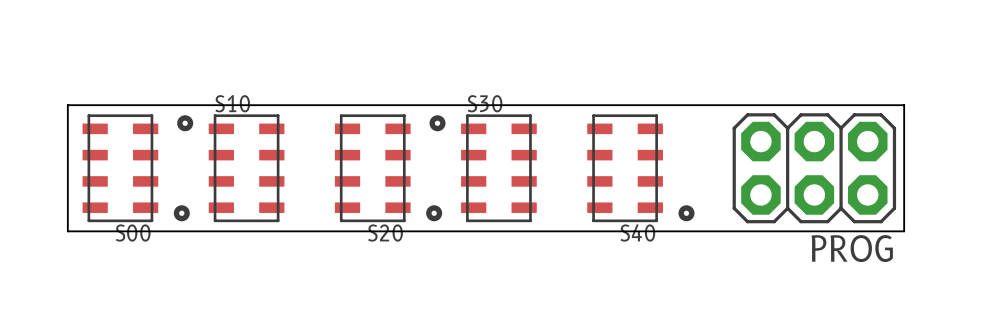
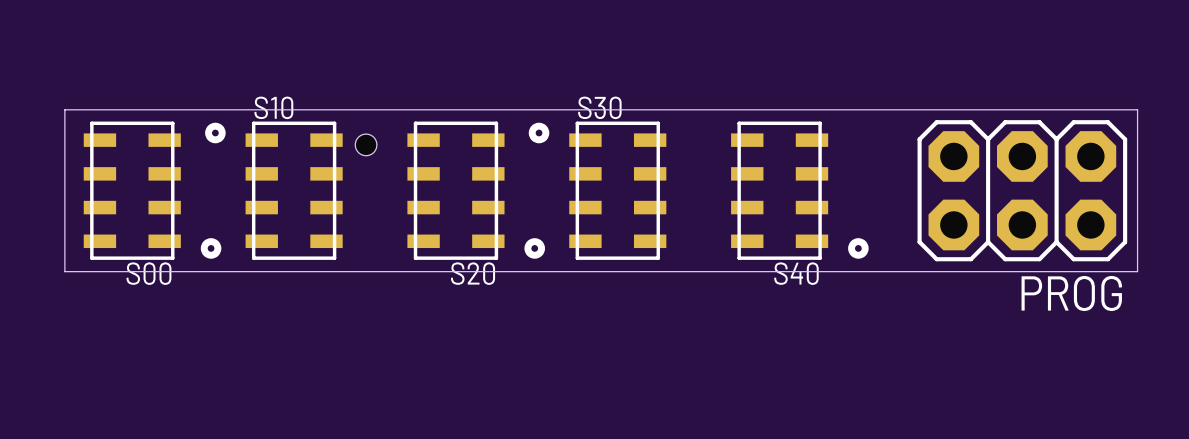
hole: none -> (366, 144)

